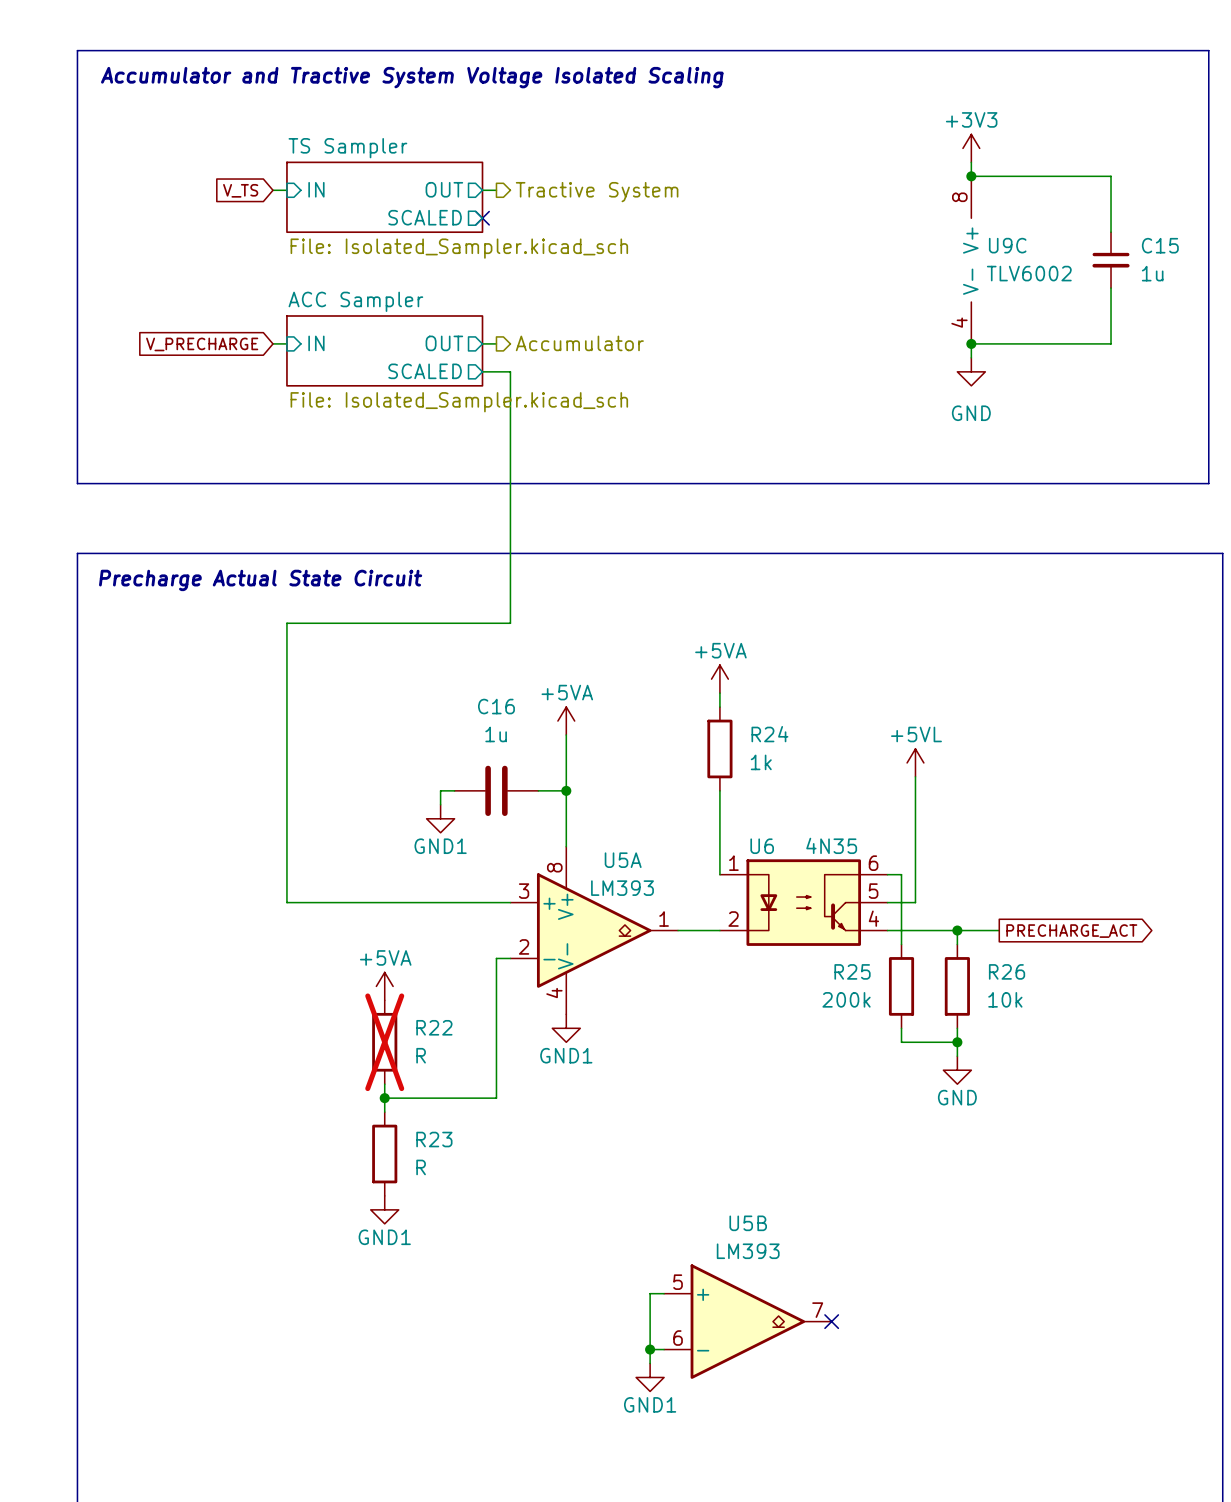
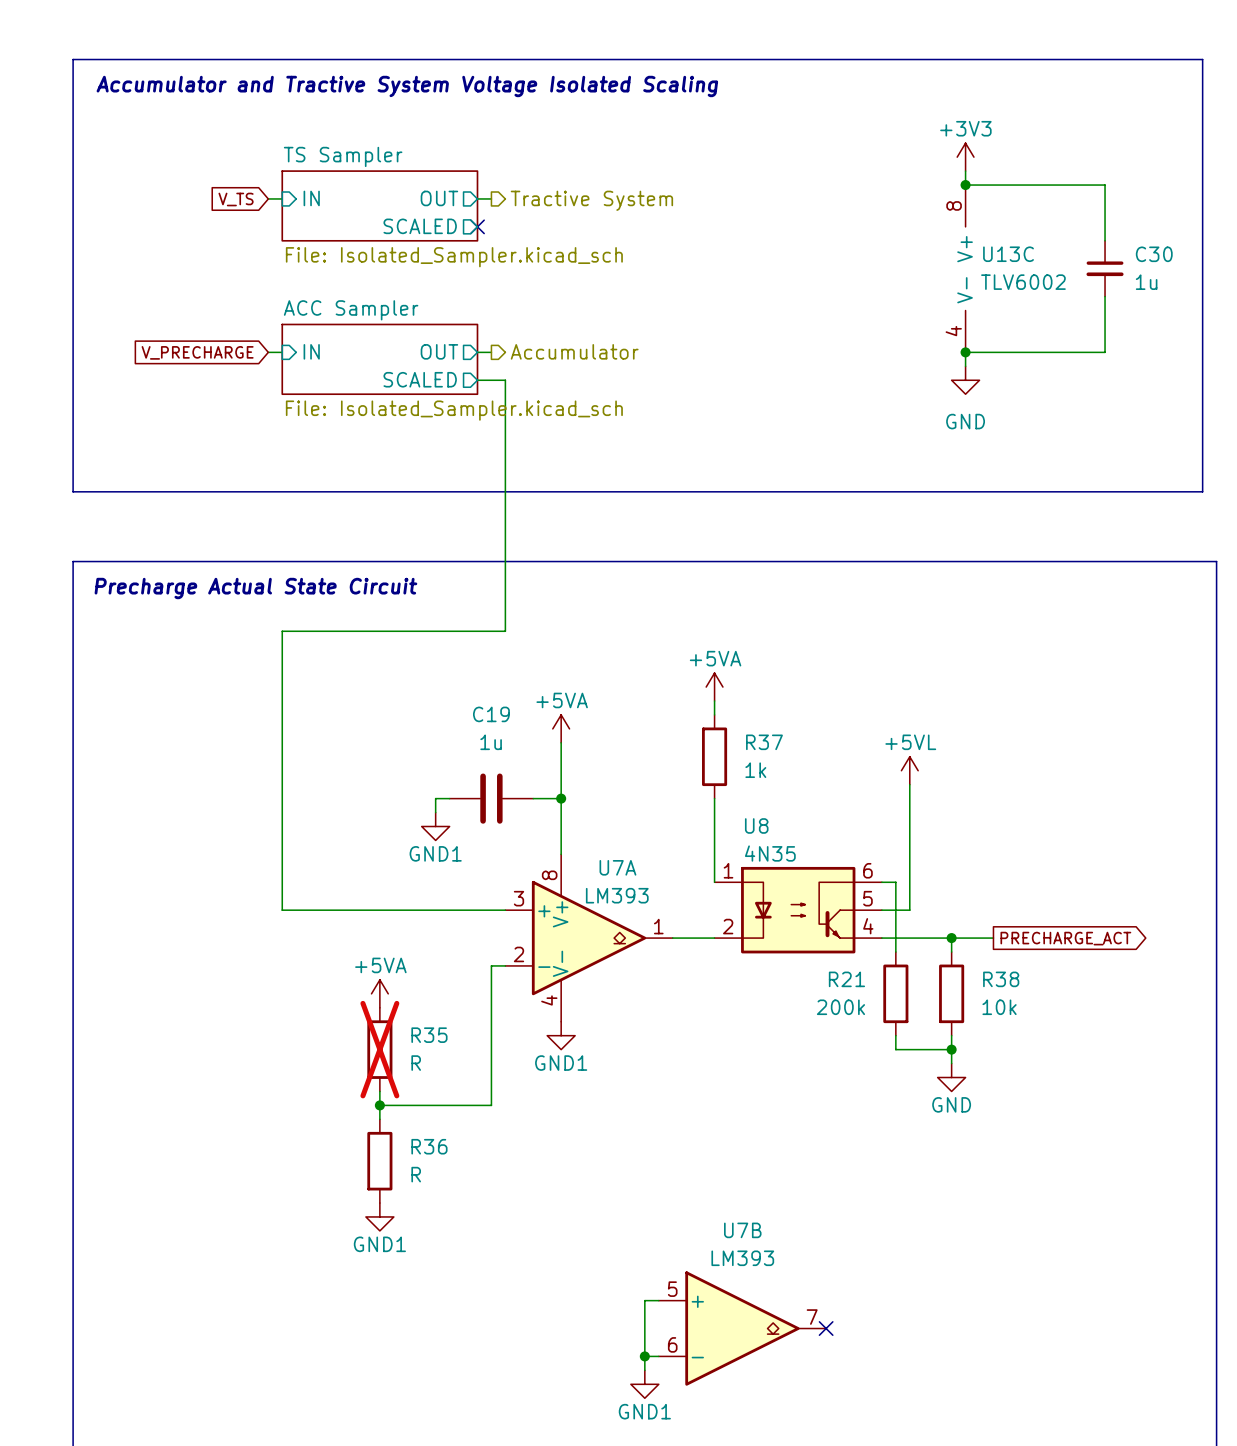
U9C name: U9C (1007, 245) -> U13C (1008, 254)
C15 name: C15 (1160, 245) -> C30 (1154, 254)
C16 name: C16 (496, 706) -> C19 (491, 714)
R24 name: R24 (769, 734) -> R37 (764, 742)
U6 value position: 4N35 (831, 845) -> 4N35 (770, 853)
U6 name: U6 (762, 846) -> U8 (756, 825)
U5A name: U5A (623, 860) -> U7A (617, 867)
R25 name: R25 (852, 971) -> R21 (846, 979)
R26 name: R26 (1007, 971) -> R38 (1001, 979)
R22 name: R22 (434, 1027) -> R35 (429, 1035)
R23 name: R23 (434, 1139) -> R36 (429, 1146)
U5B name: U5B (748, 1223) -> U7B (742, 1230)

